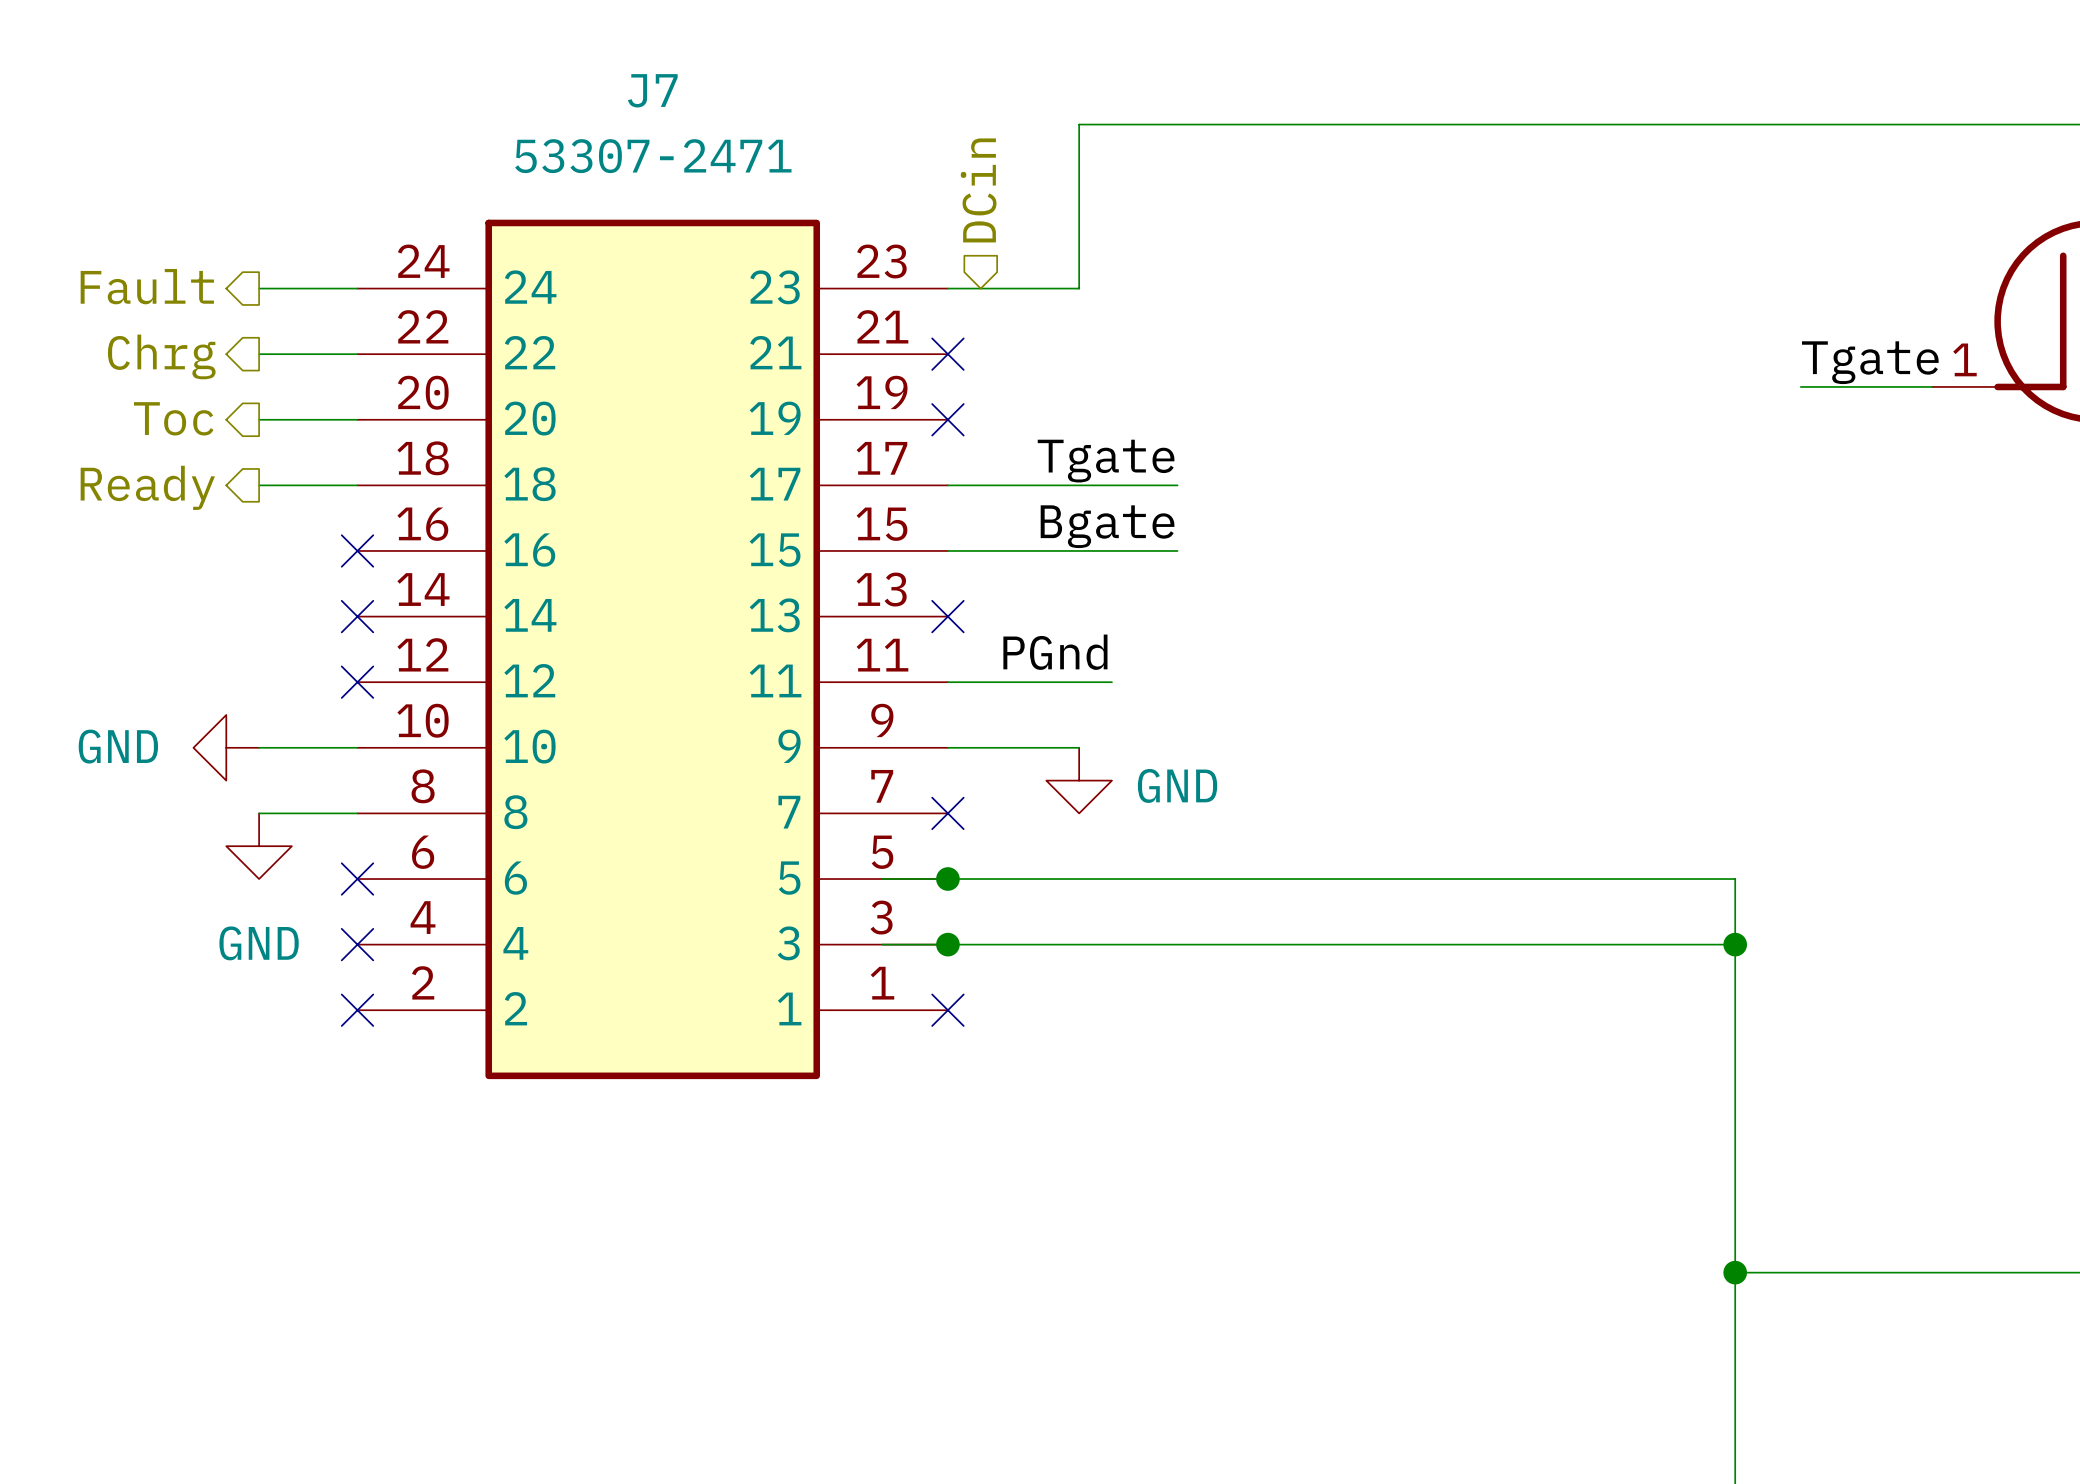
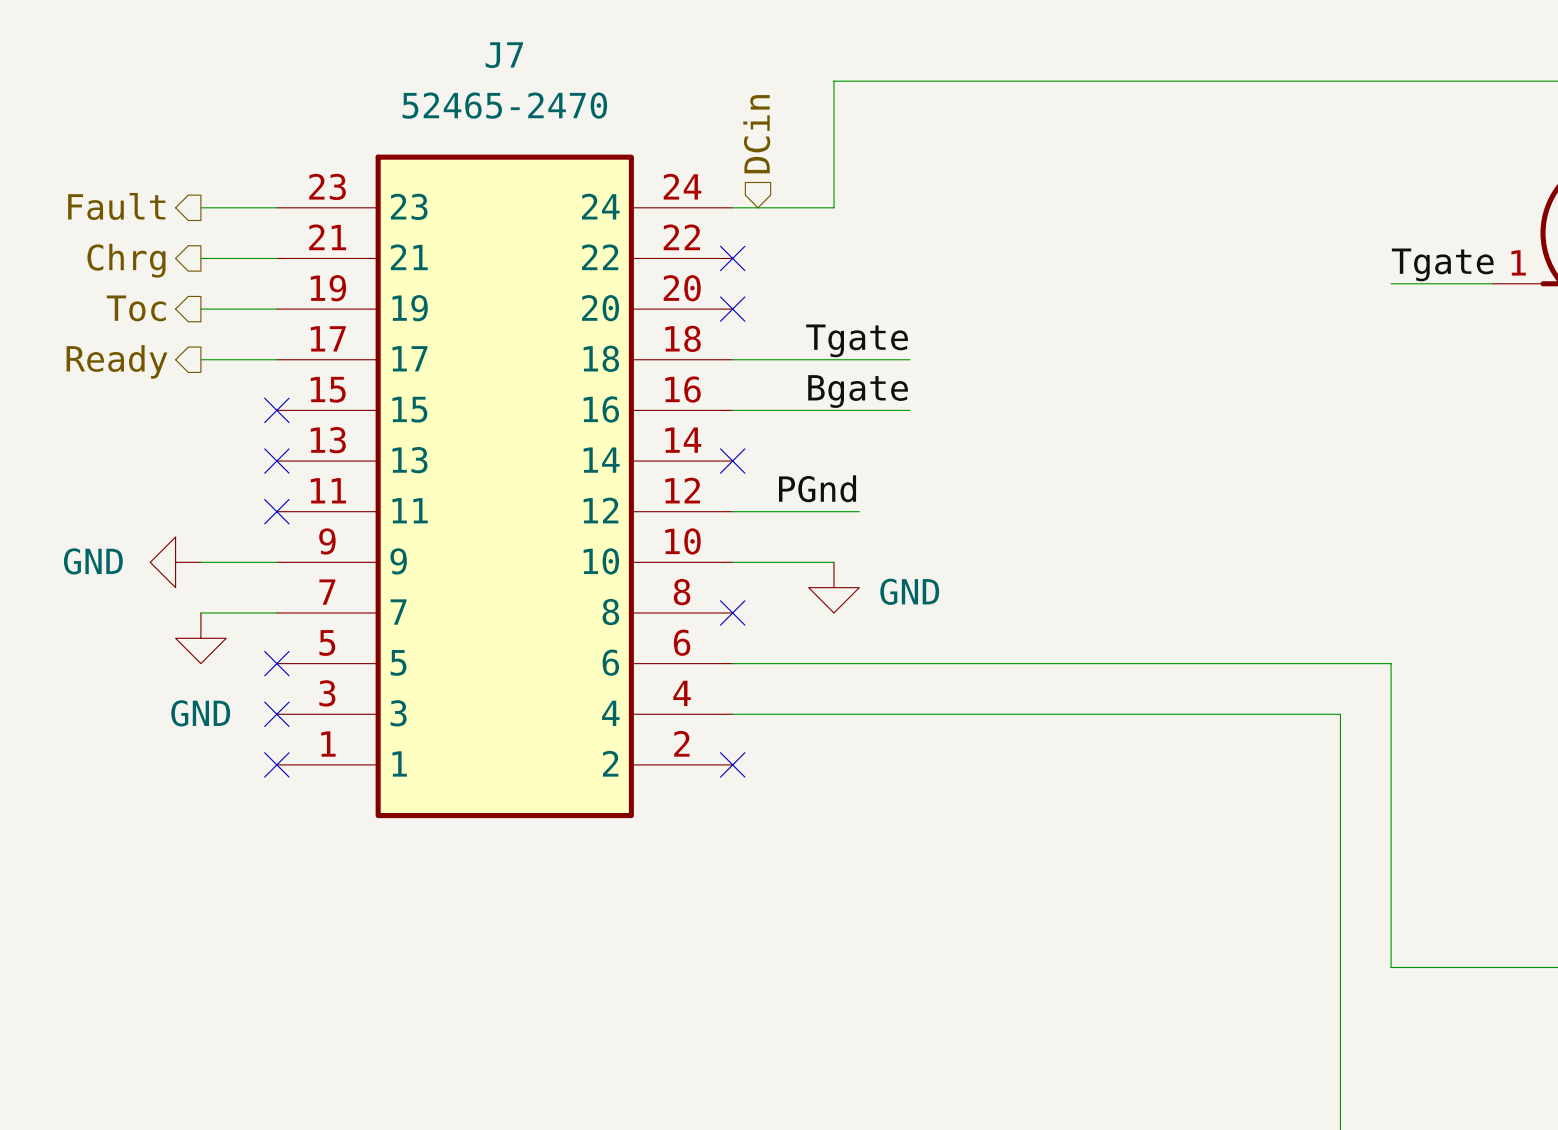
J7 value: 53307-2471 (653, 156) -> 52465-2470 (504, 105)
J7 flip: as is (652, 649) -> left-right (504, 486)
junction: (947, 879) -> none
wire: (1735, 879) (1735, 944) -> (1340, 663) (1391, 663) (1391, 967)
junction: (947, 944) -> none
junction: (1735, 944) -> none
wire: (1735, 1272) (1800, 1272) -> none
junction: (1735, 1272) -> none

